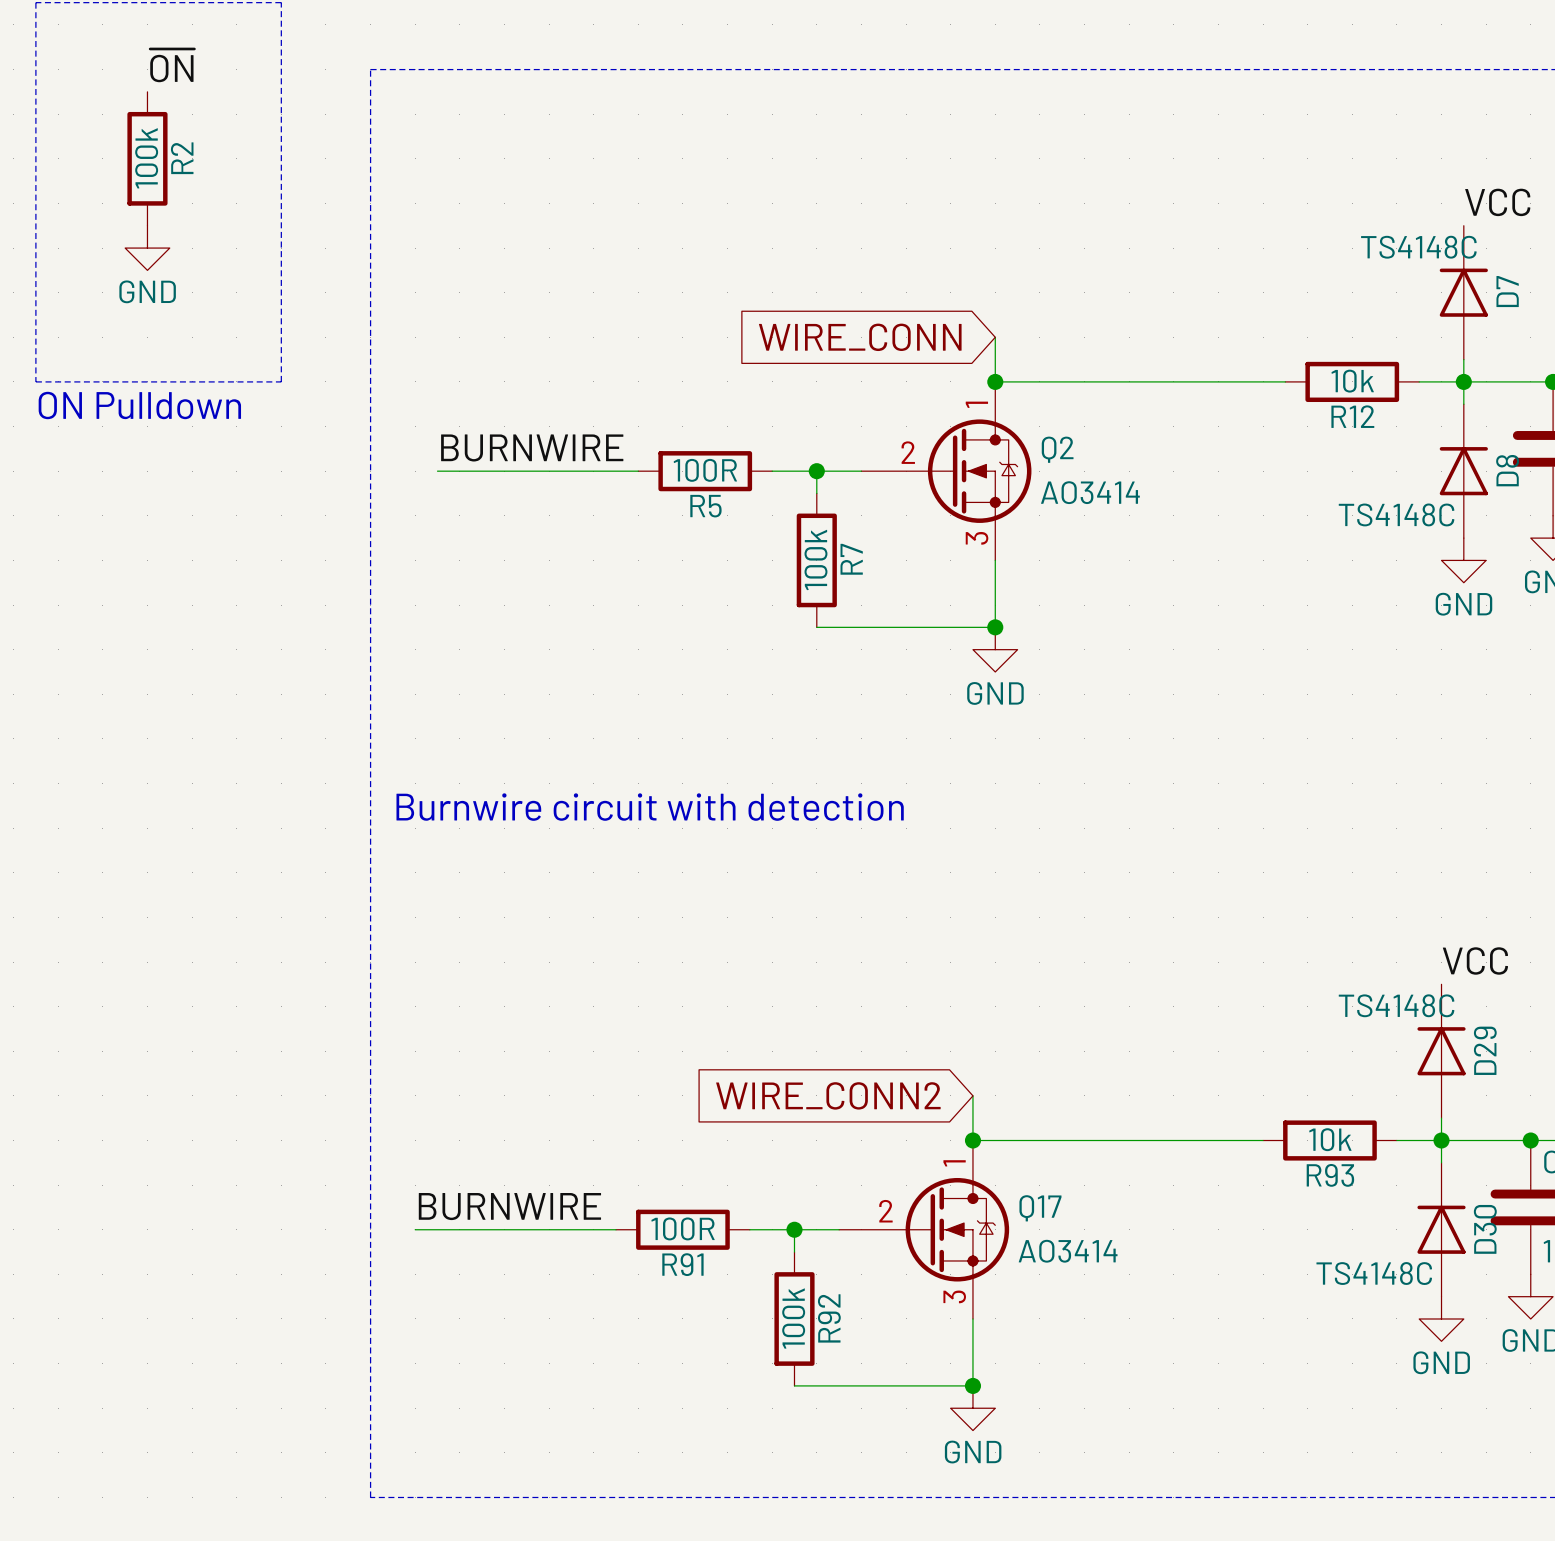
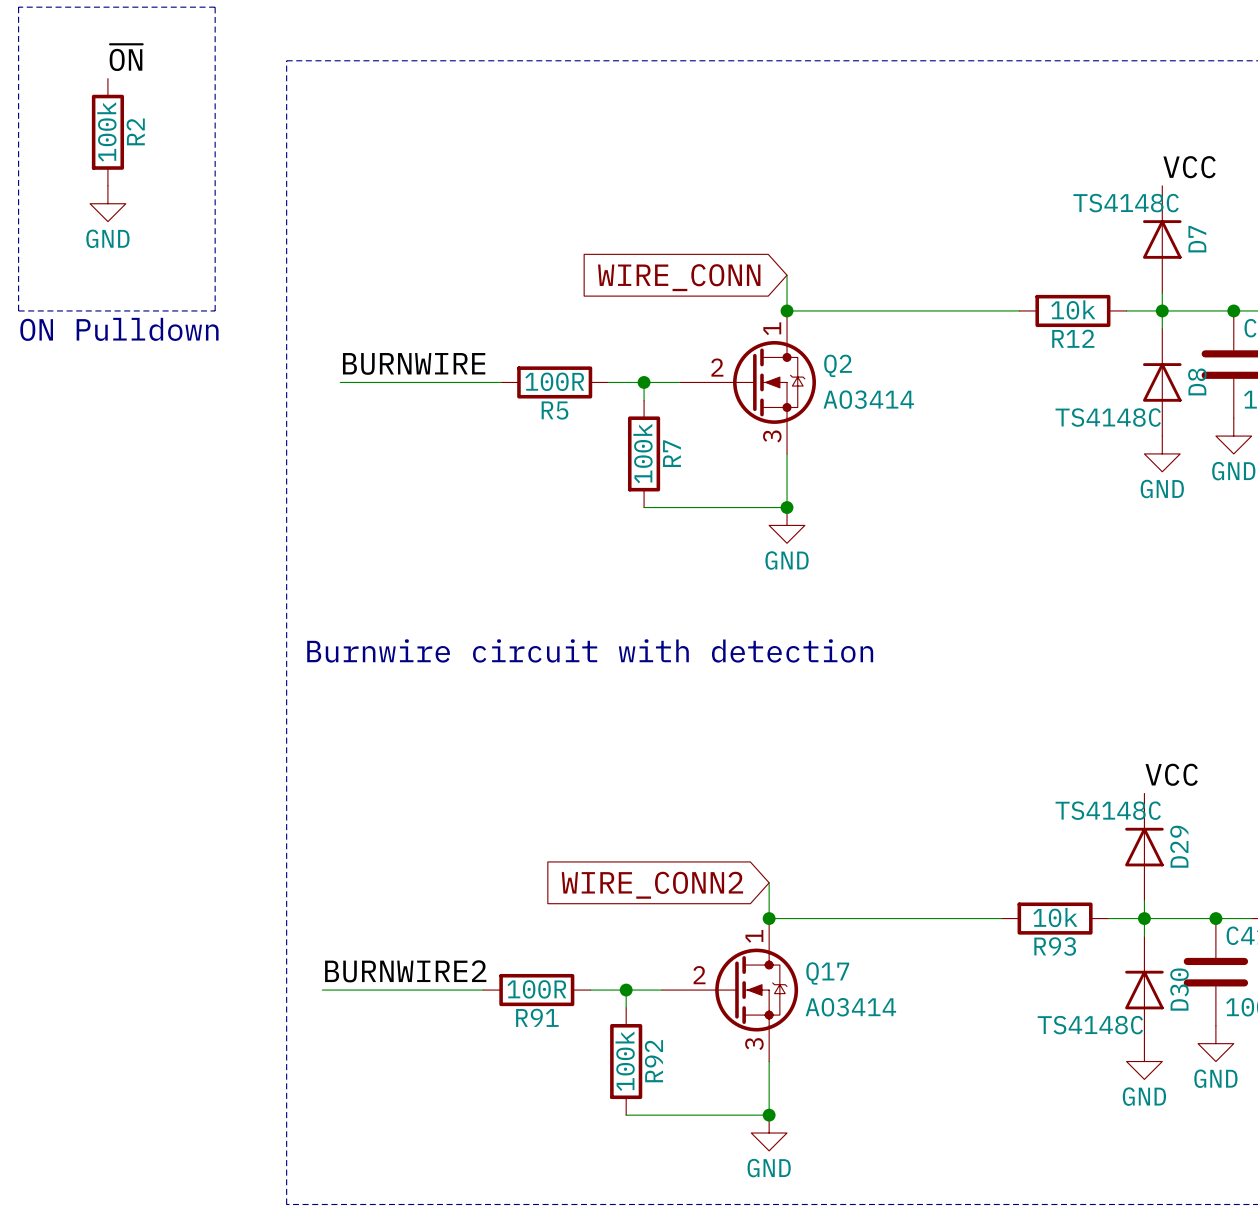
label: BURNWIRE (509, 1206) -> BURNWIRE2 (405, 971)

